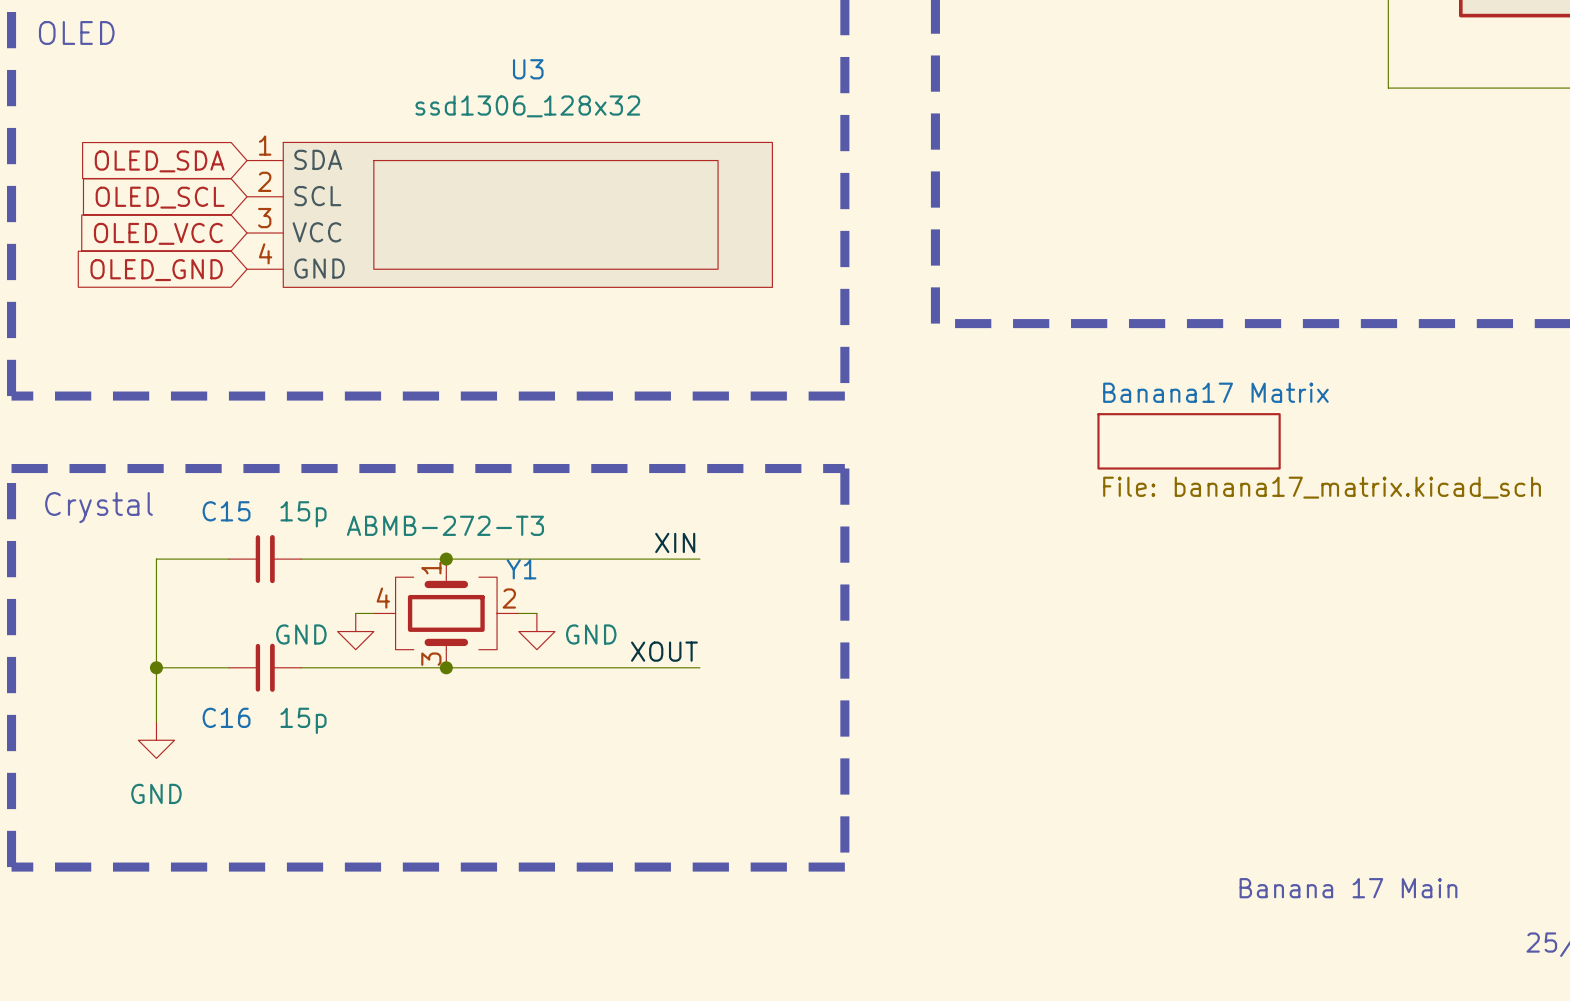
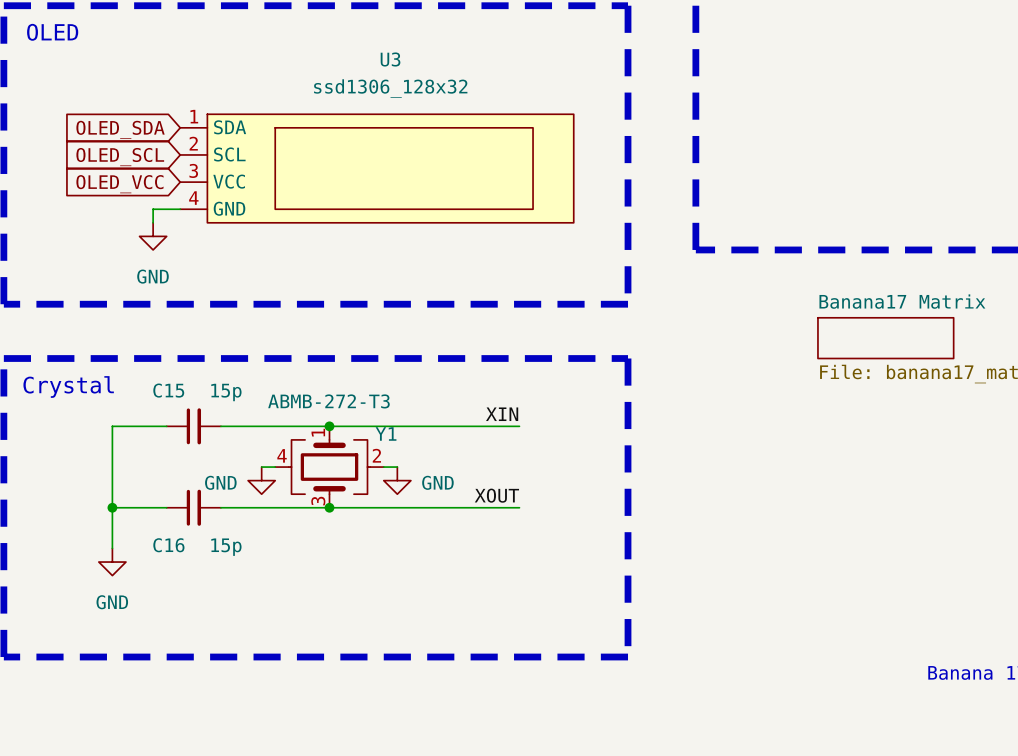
wire: none -> (180, 209) (153, 209) (153, 222)
global label: OLED_GND (156, 270) -> none
power symbol: none -> GND (153, 236)

